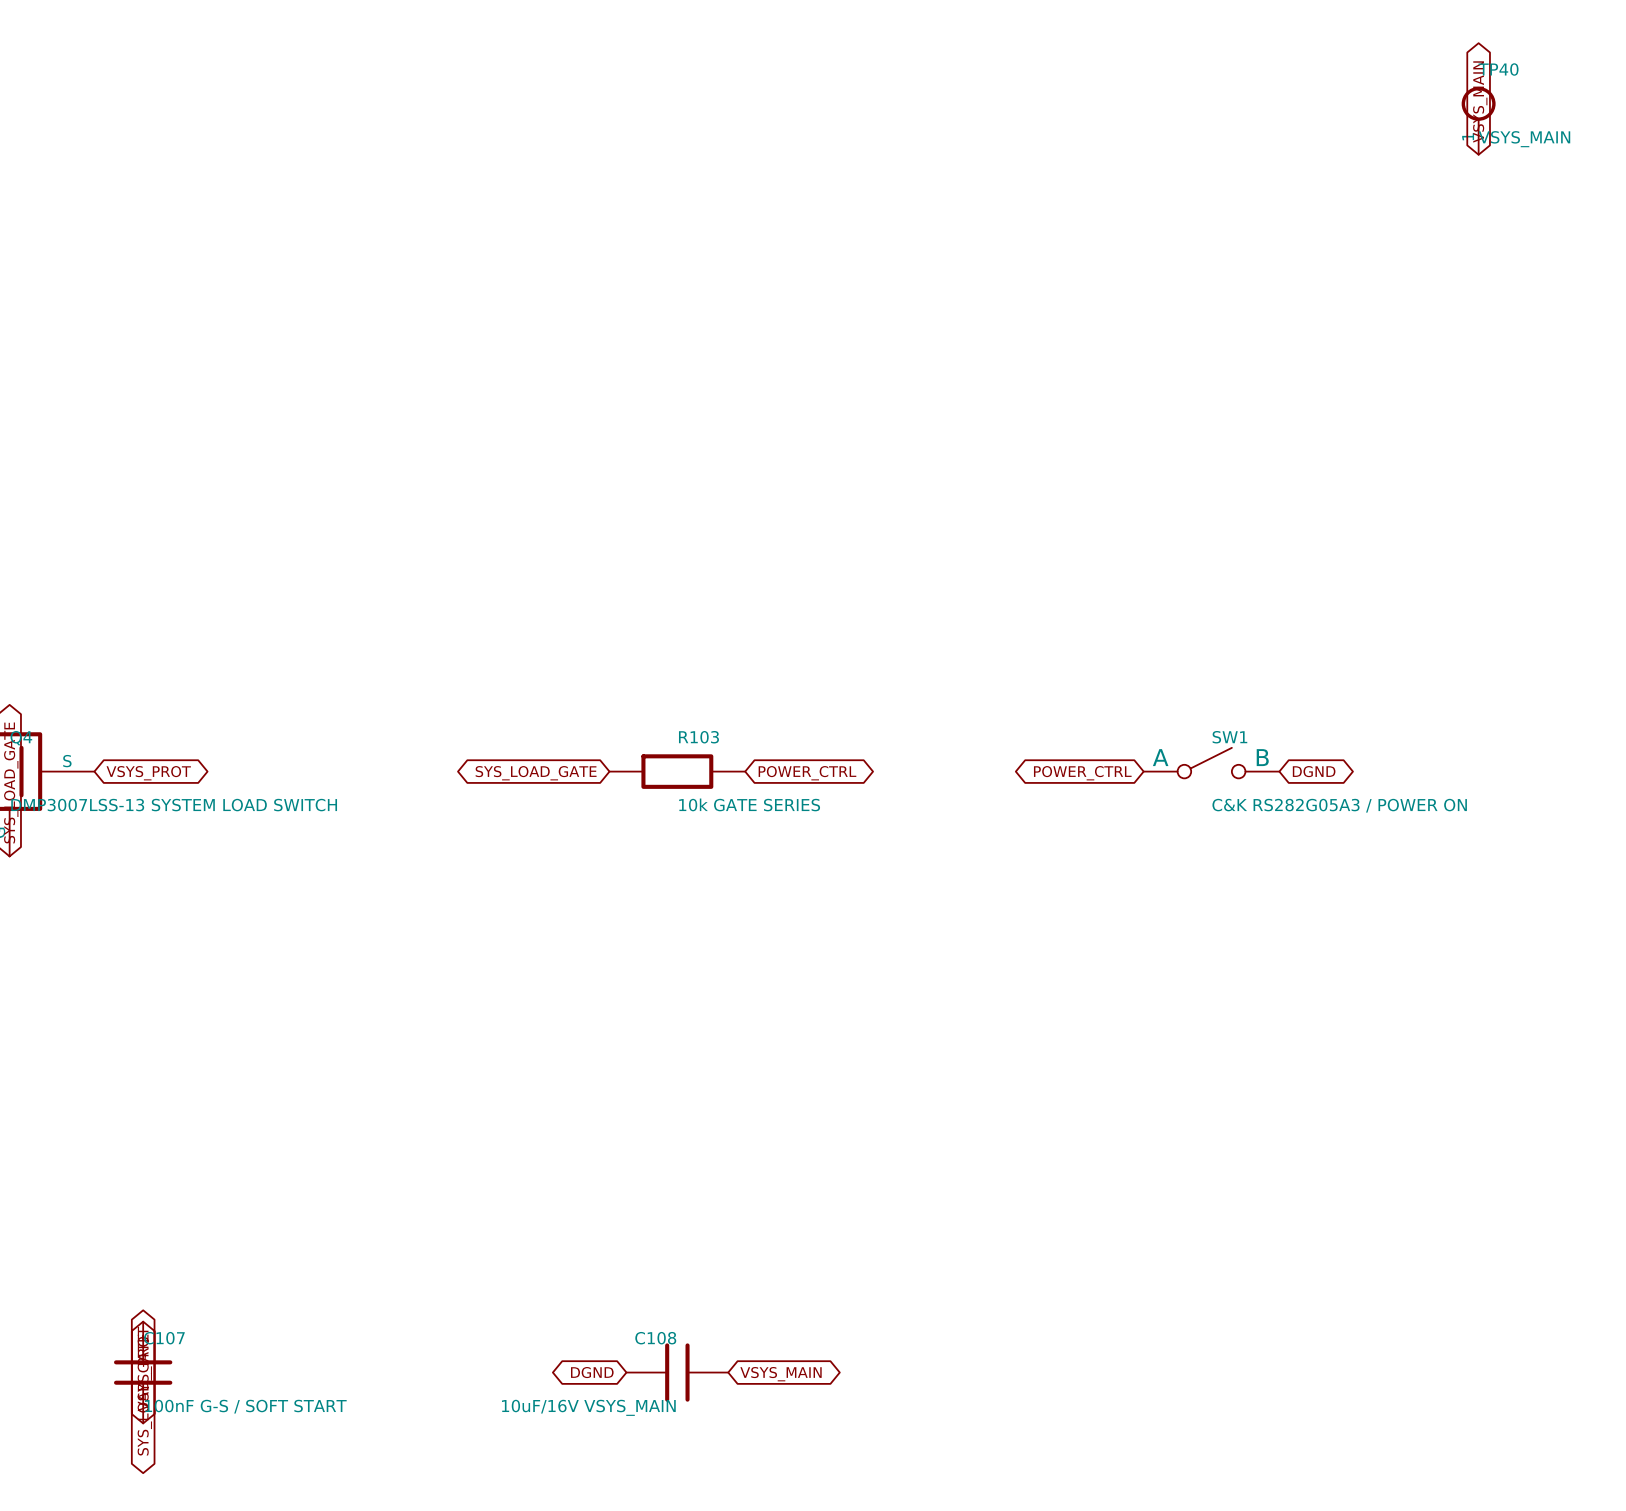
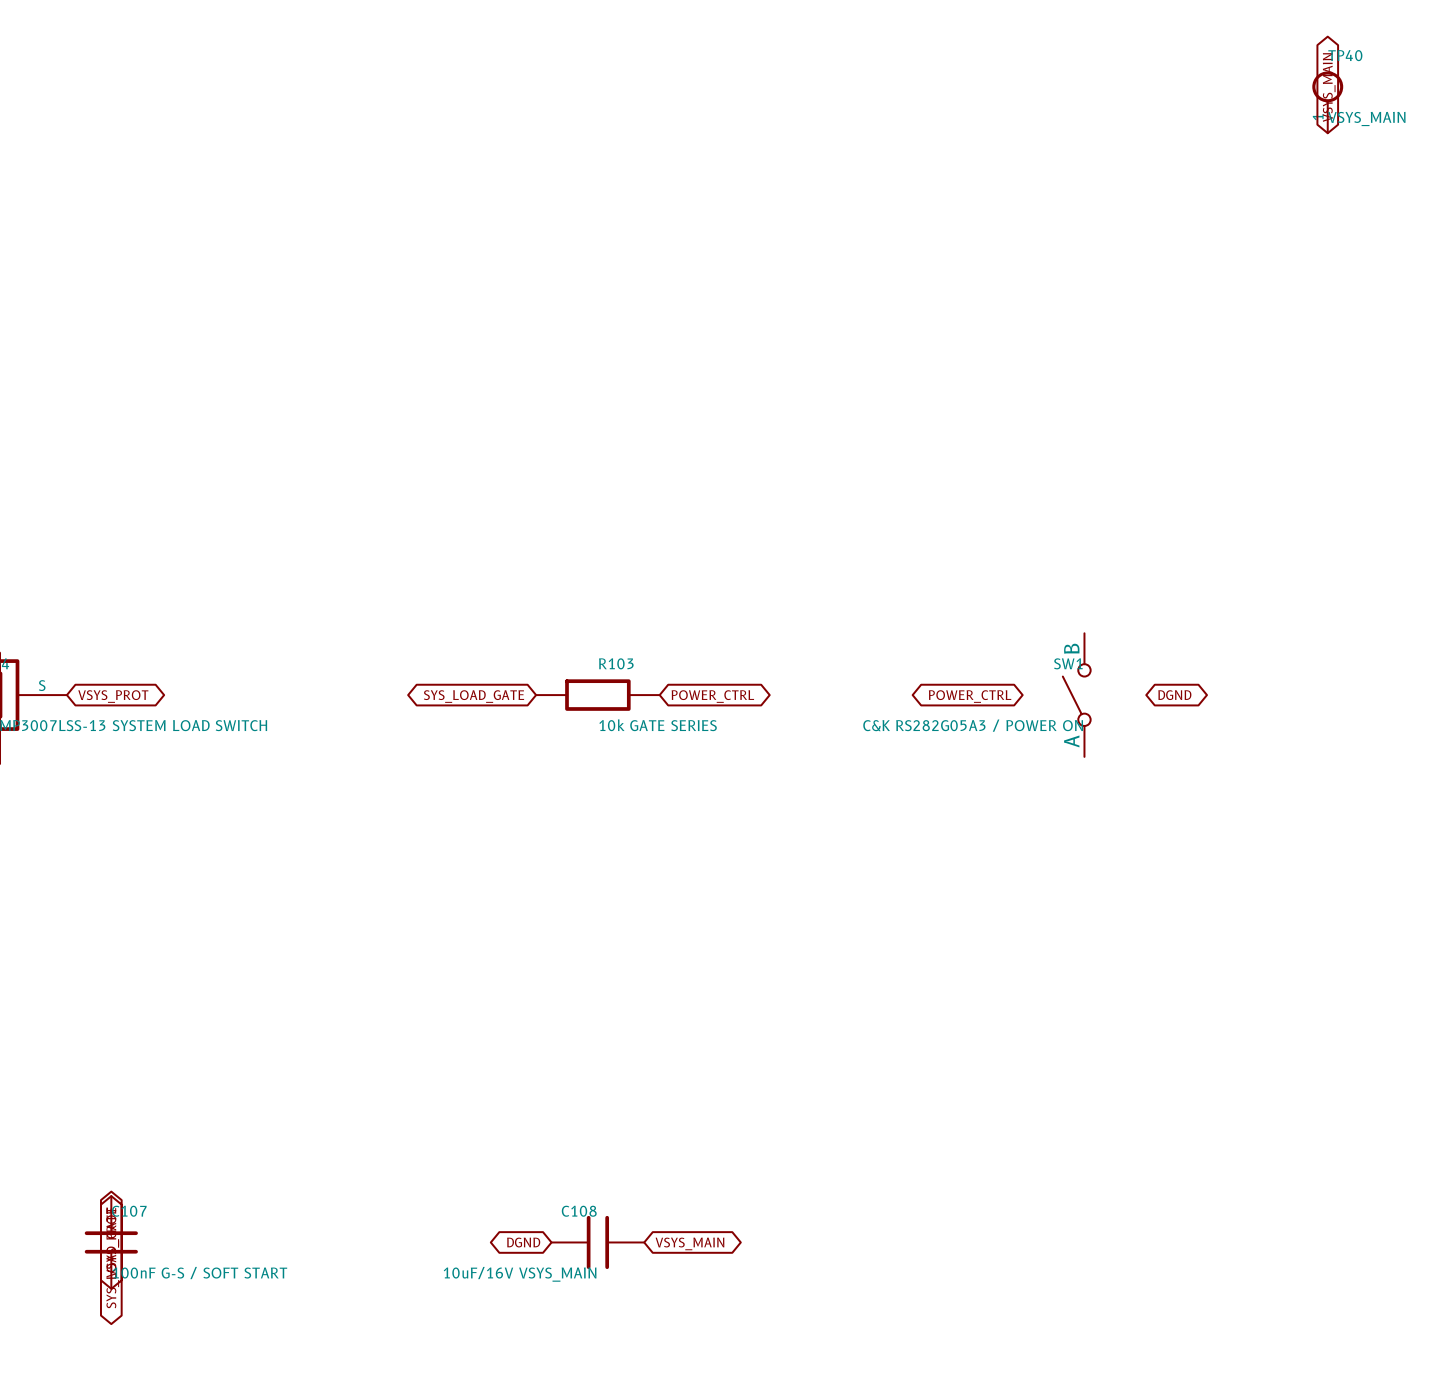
SW1 rotation: 0° (1211, 763) -> 90° counterclockwise (1076, 695)
SW1 value position: C&K RS282G05A3 / POWER ON (1339, 805) -> C&K RS282G05A3 / POWER ON (973, 725)

